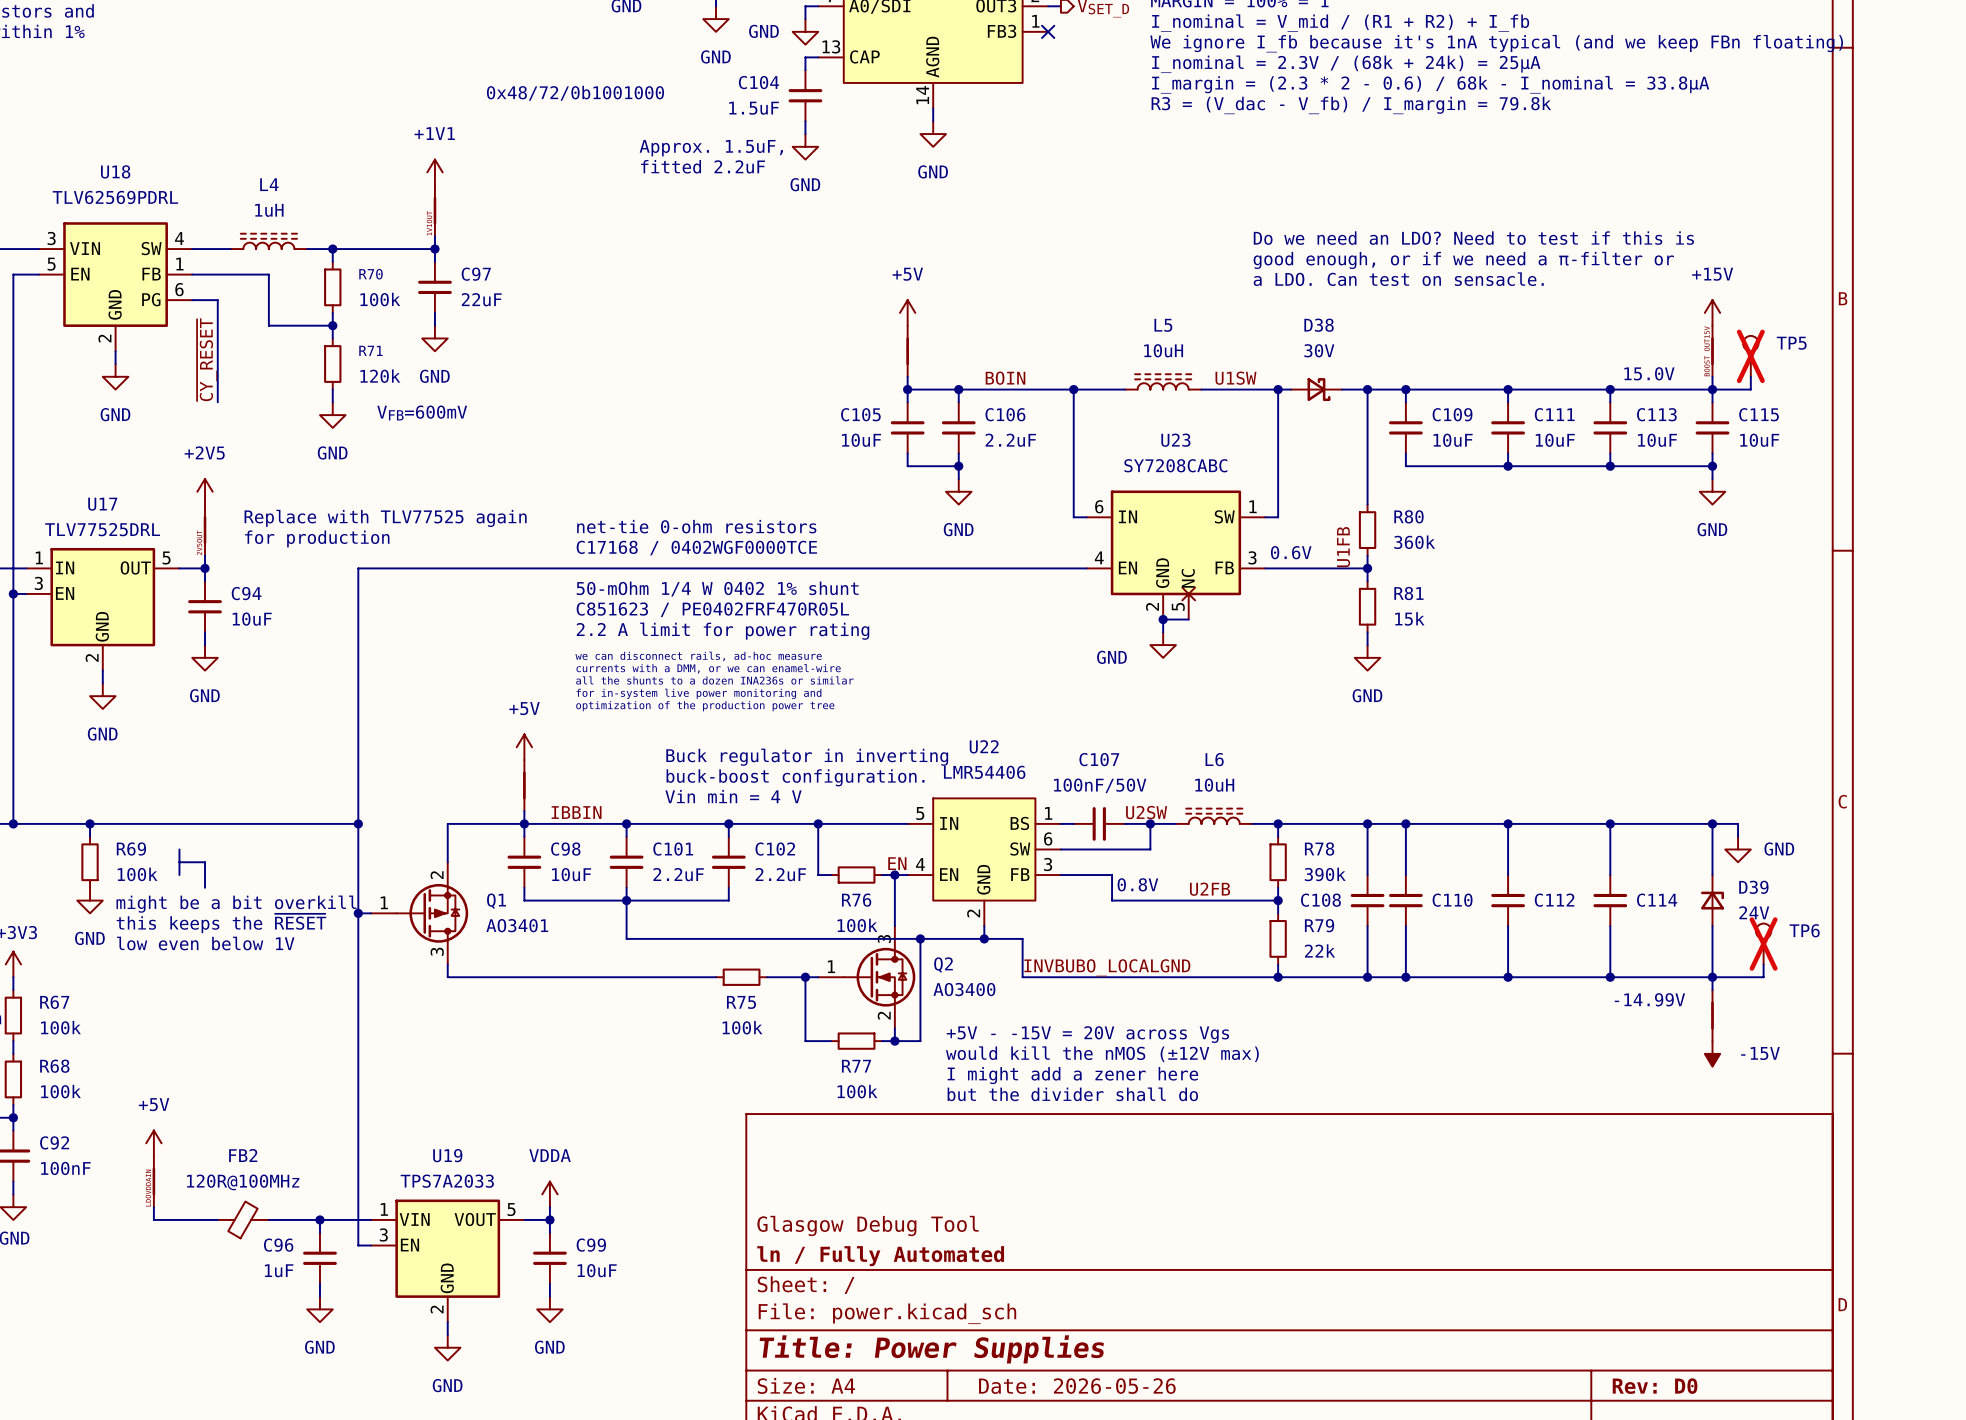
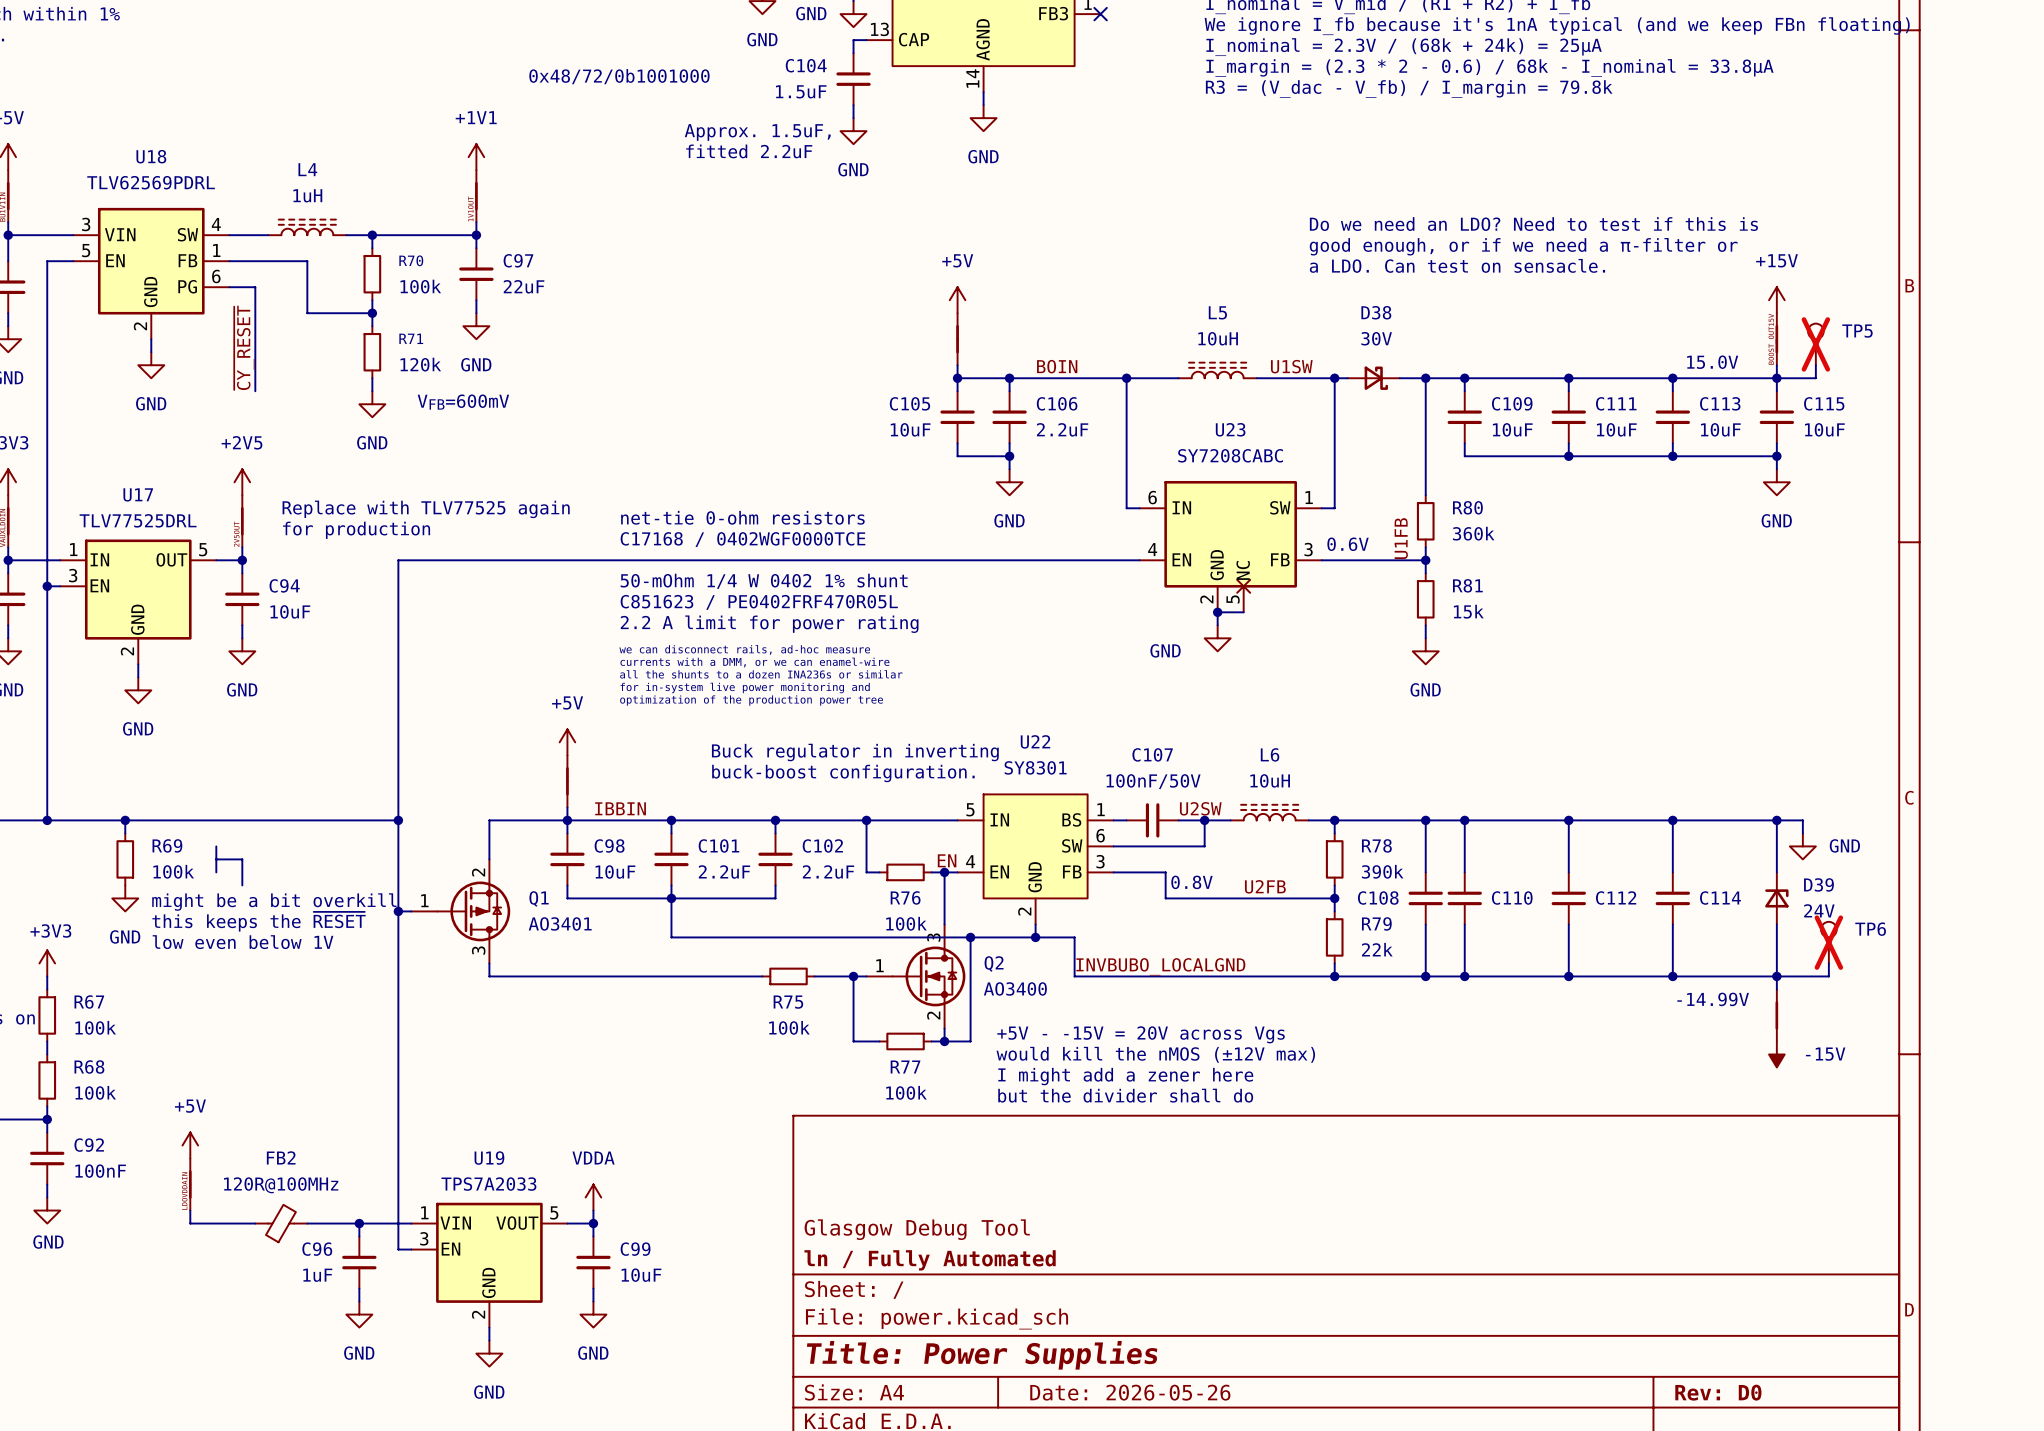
U22 value: LMR54406 (984, 772) -> SY8301 (1035, 767)
text: Vin min = 4 V (733, 796) -> none

